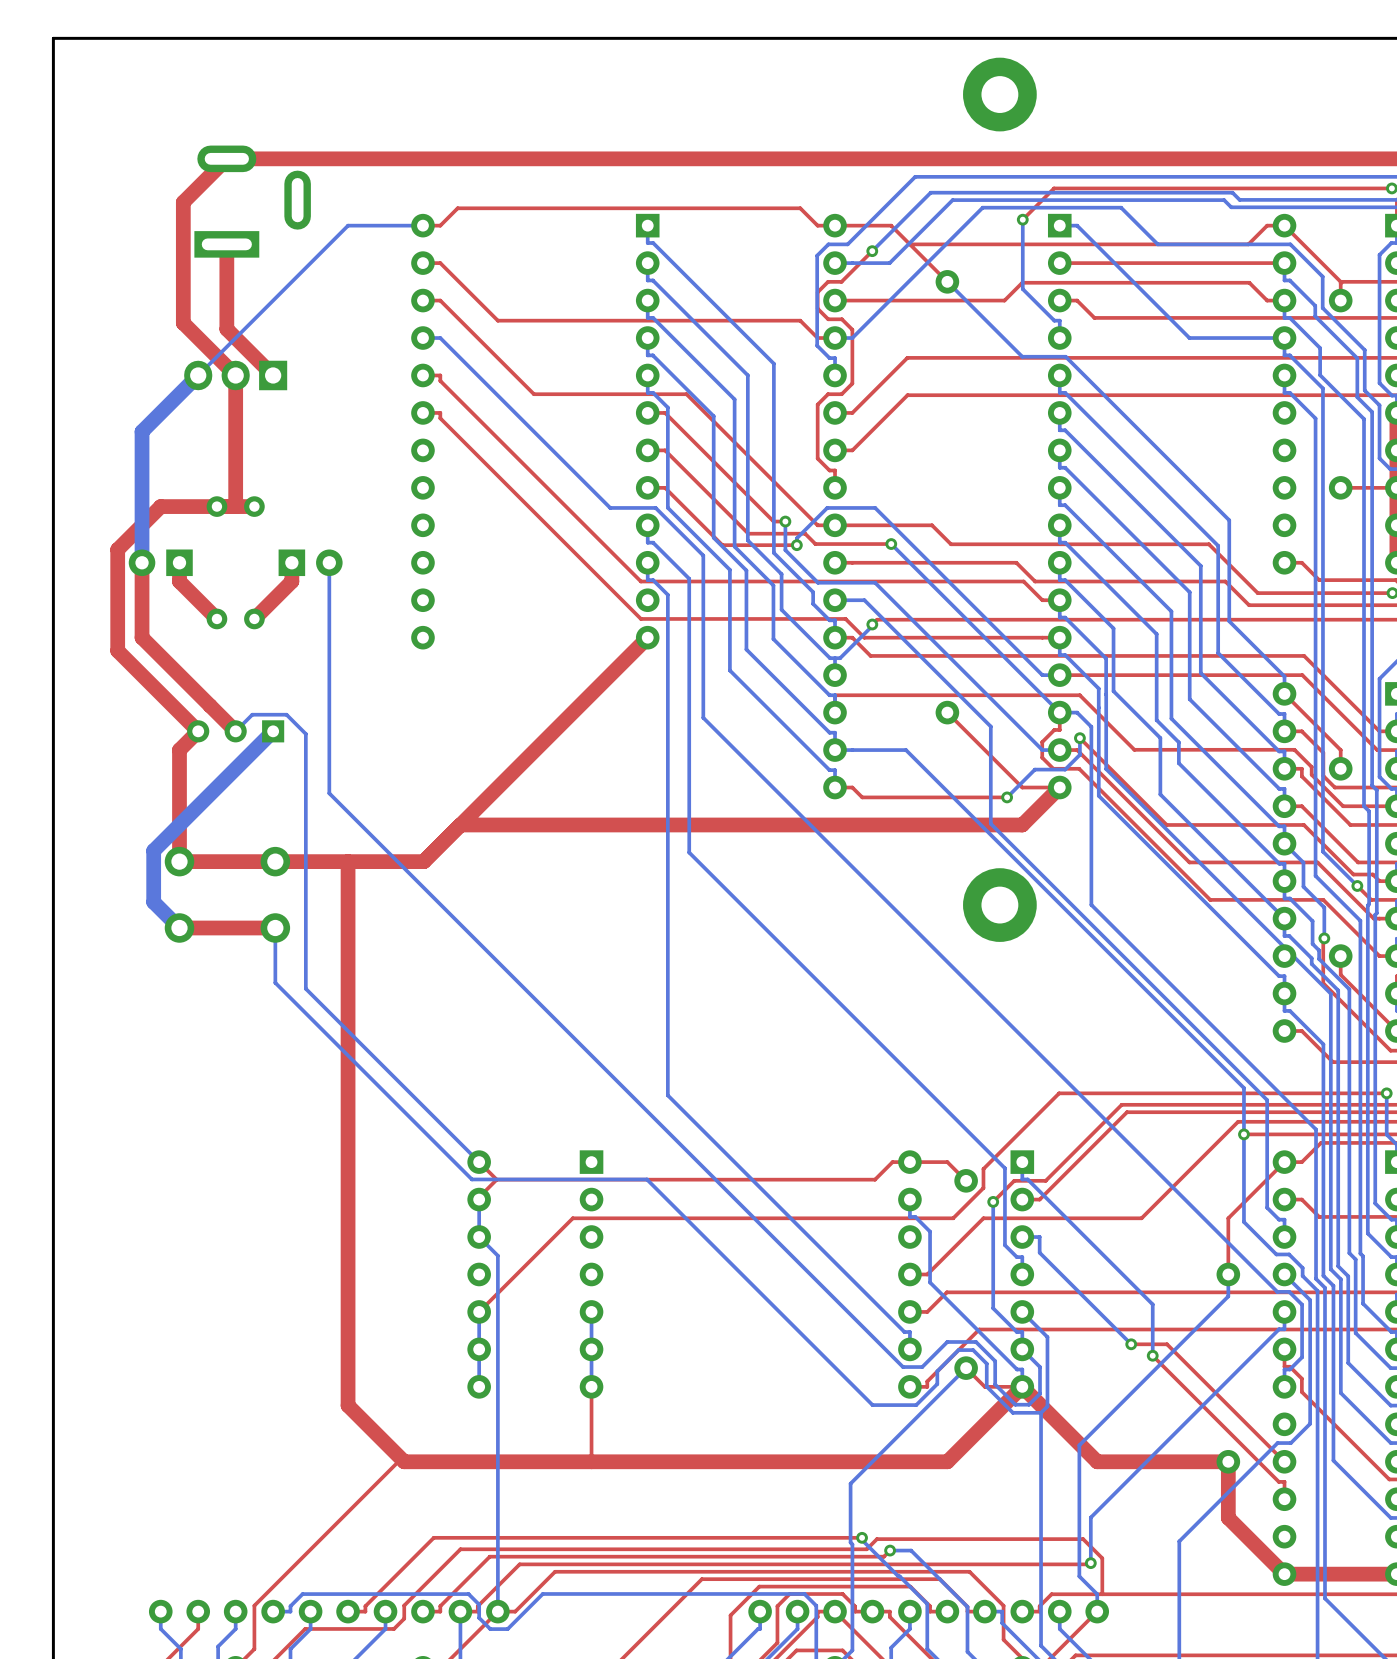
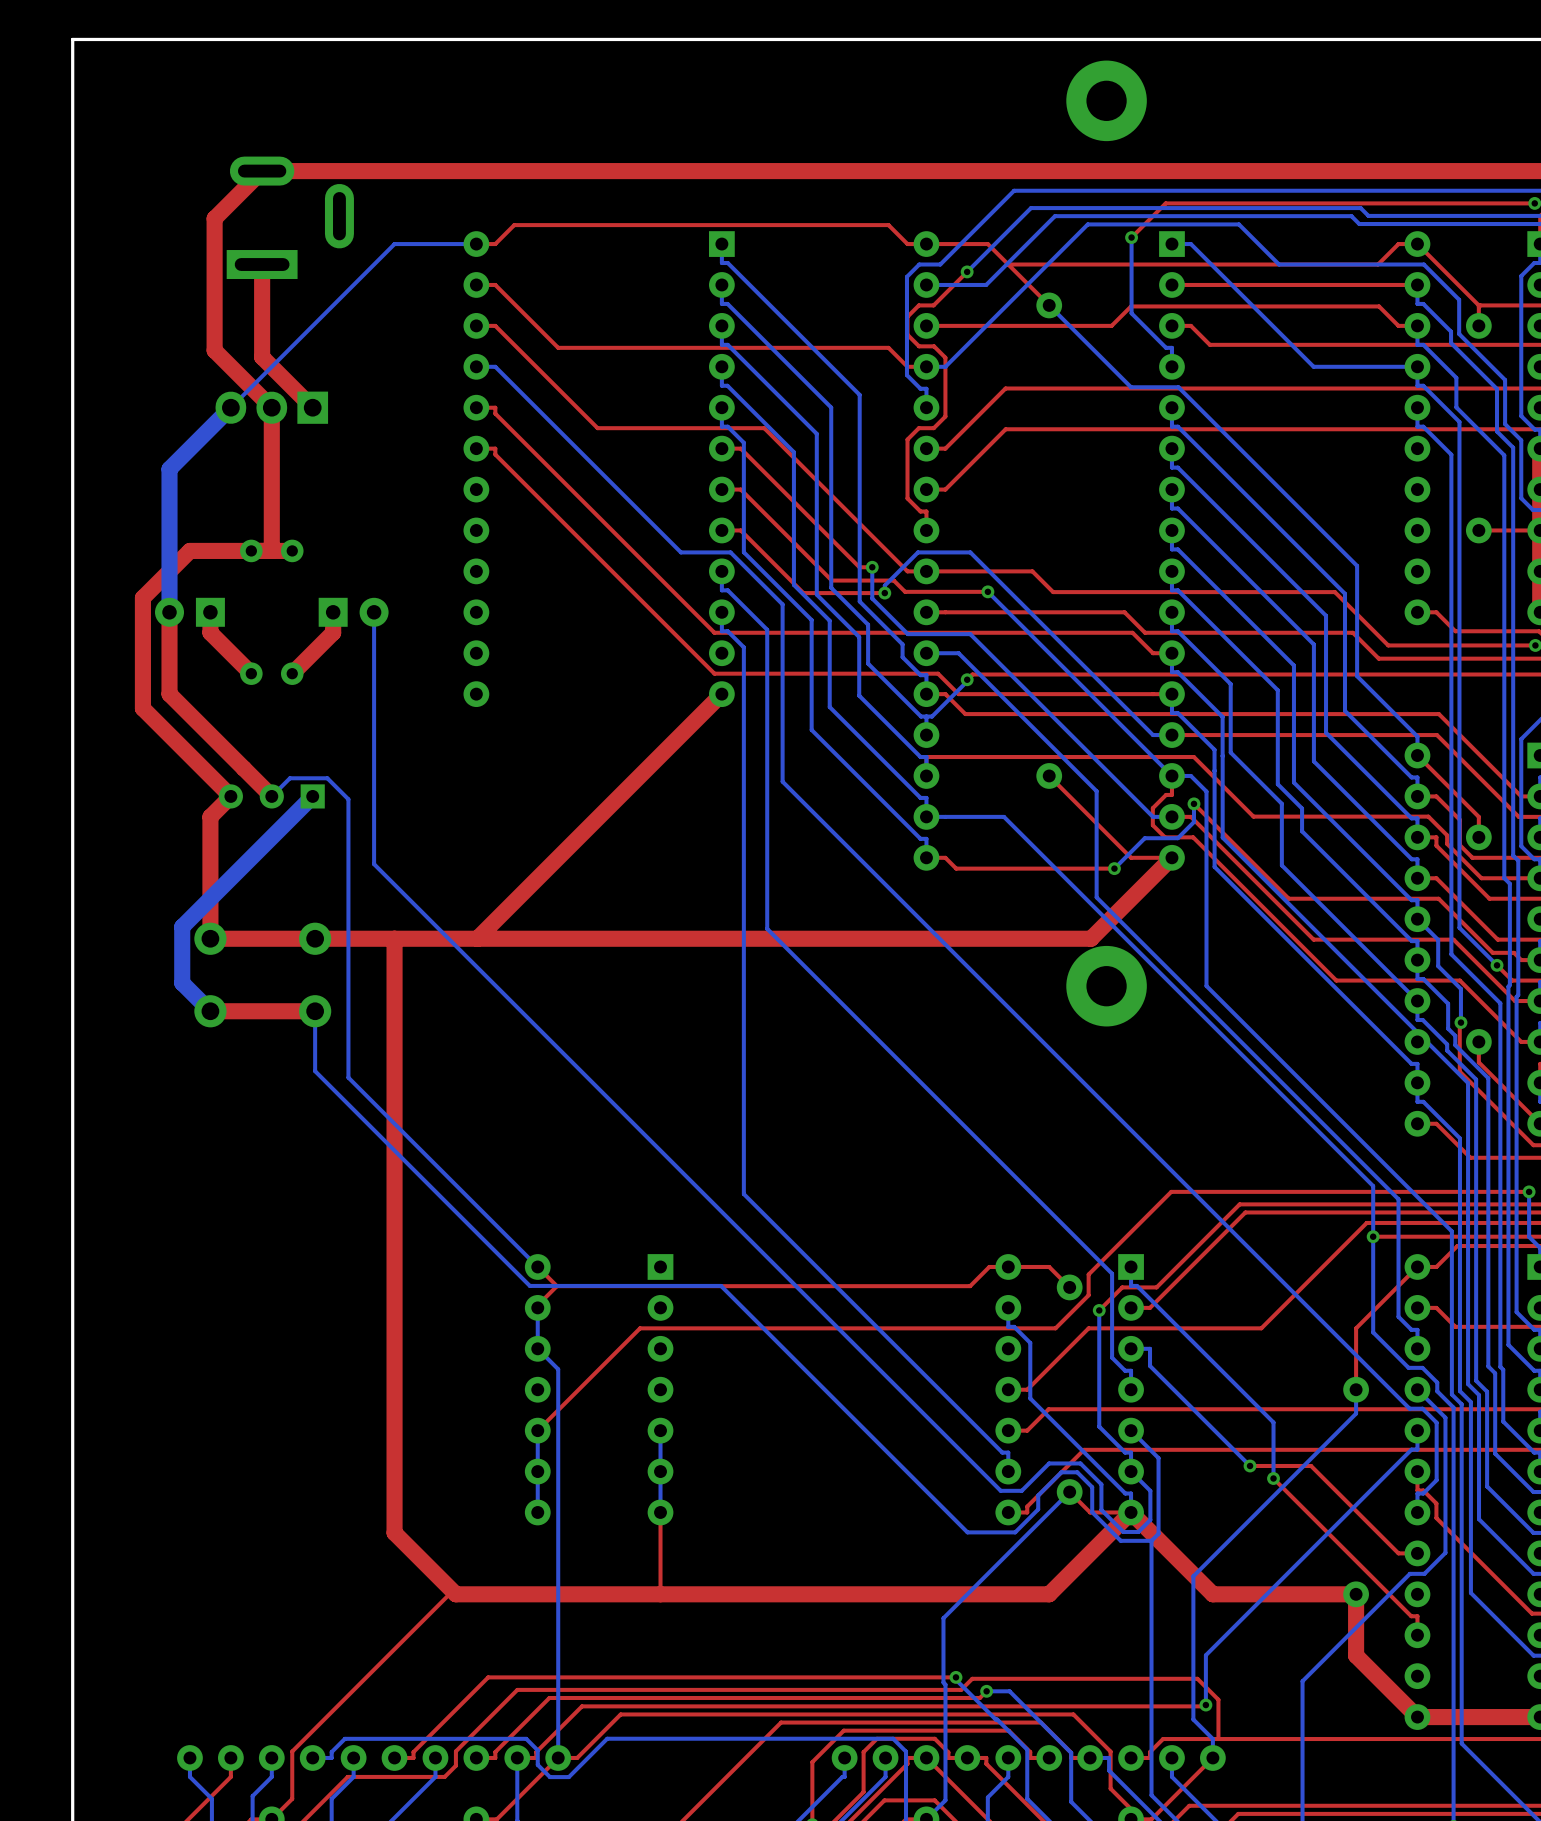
top track: (1022, 824) (460, 824) -> (1131, 898) (1091, 938) (477, 938)
top track: (1167, 1344) (1284, 1461) -> (1289, 1465) (1311, 1465) (1398, 1553) (1417, 1553)

